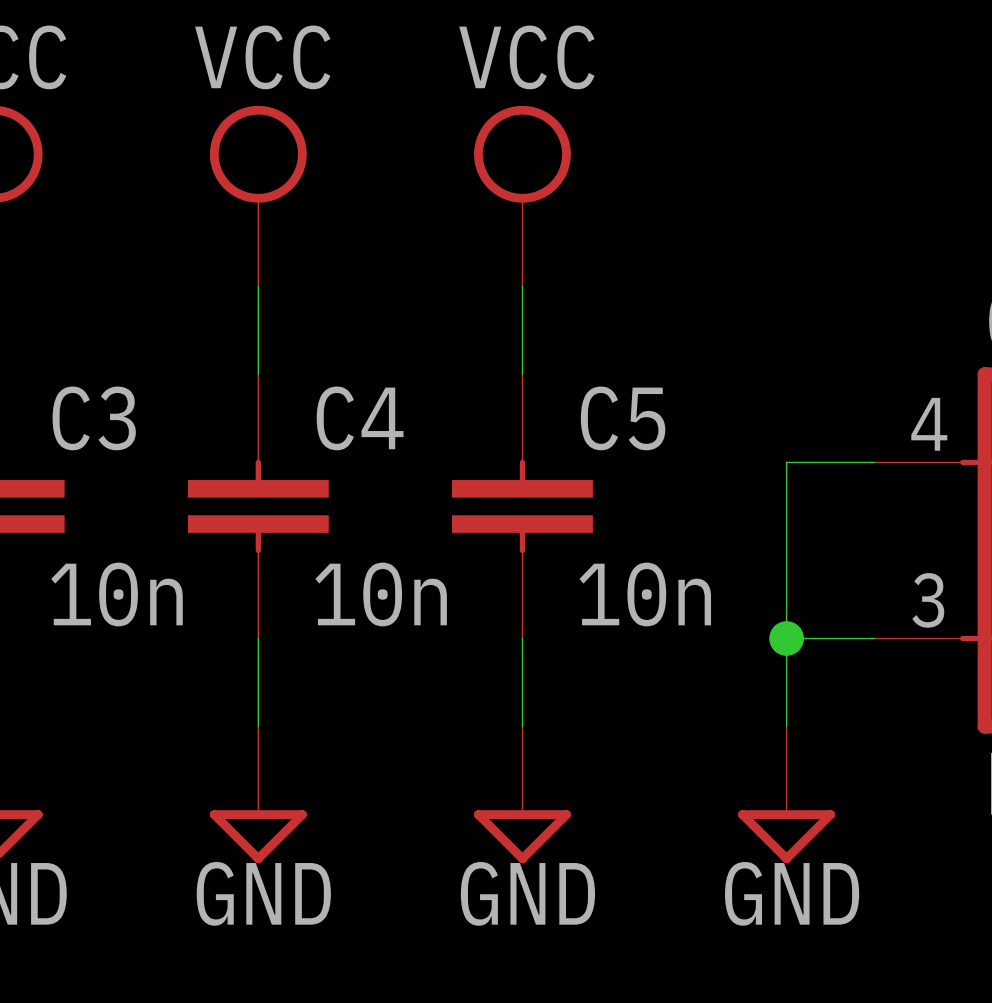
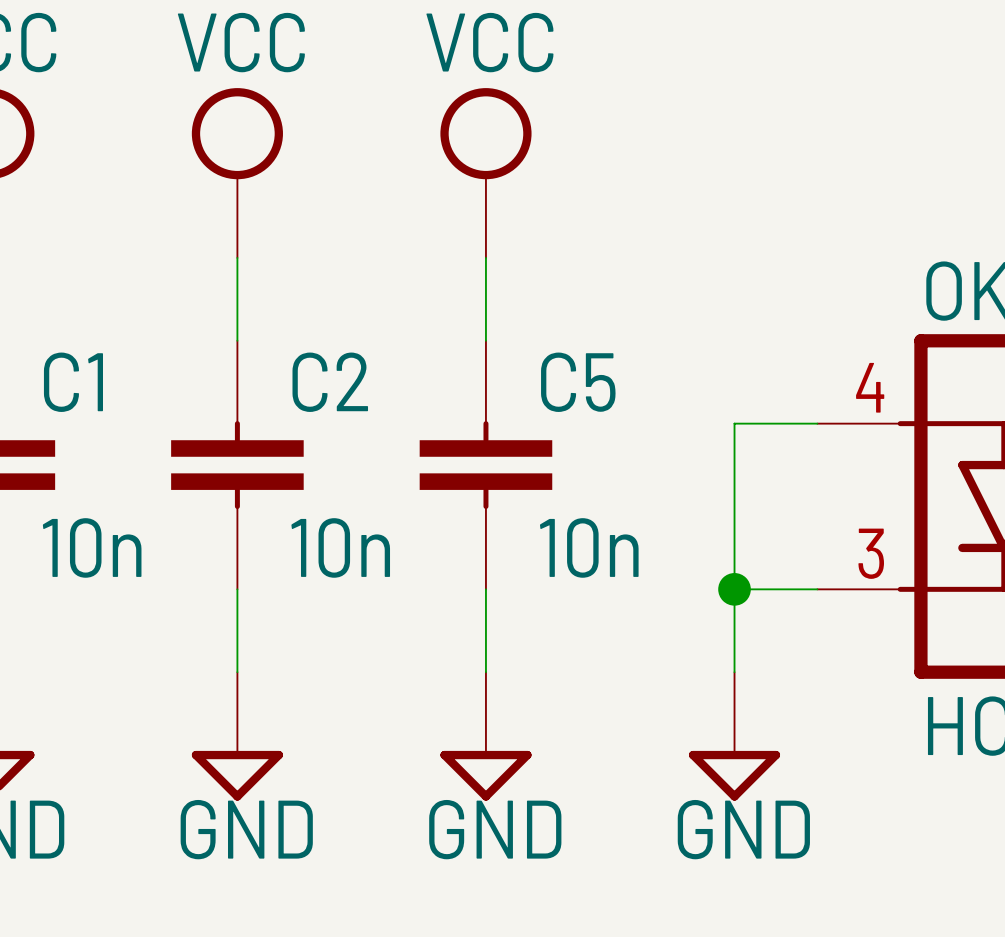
C3 name: C3 (94, 418) -> C1 (73, 382)
C4 name: C4 (360, 418) -> C2 (330, 382)

